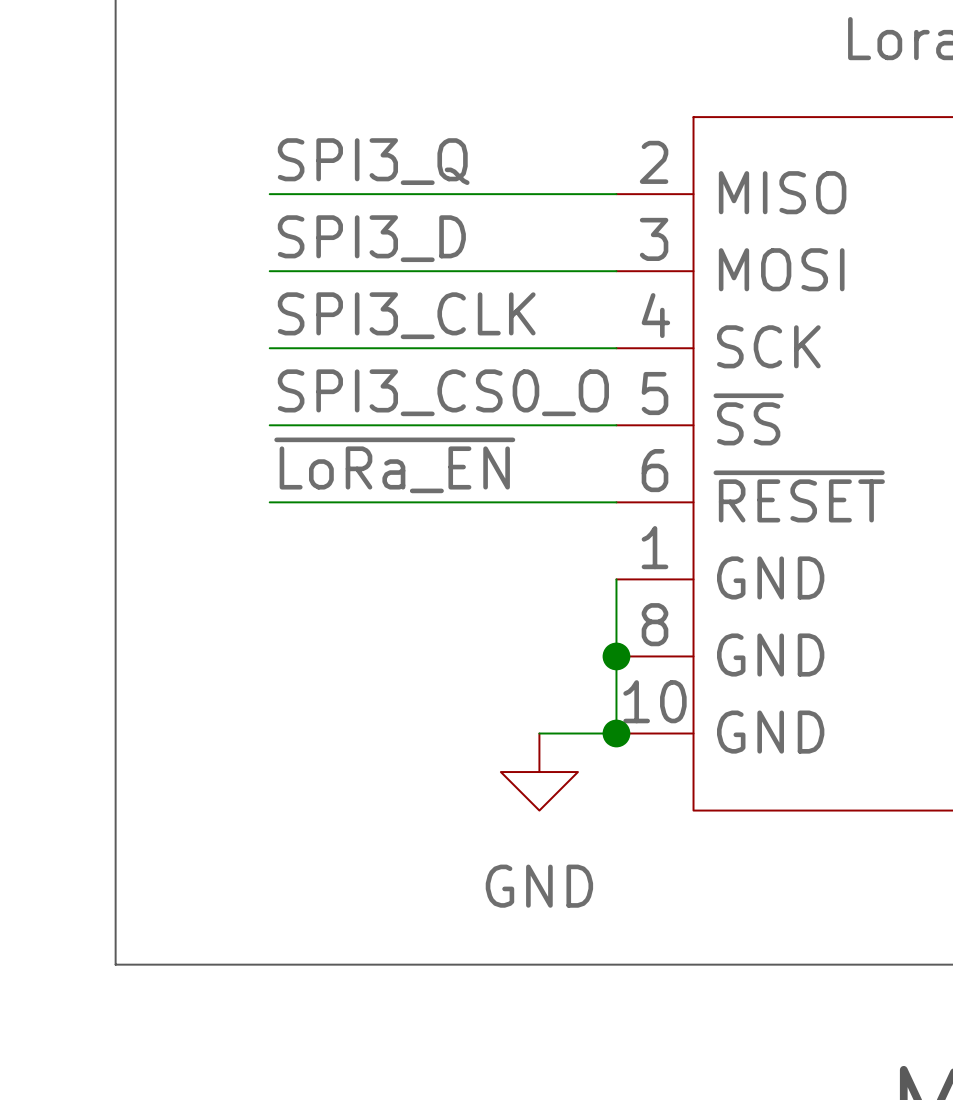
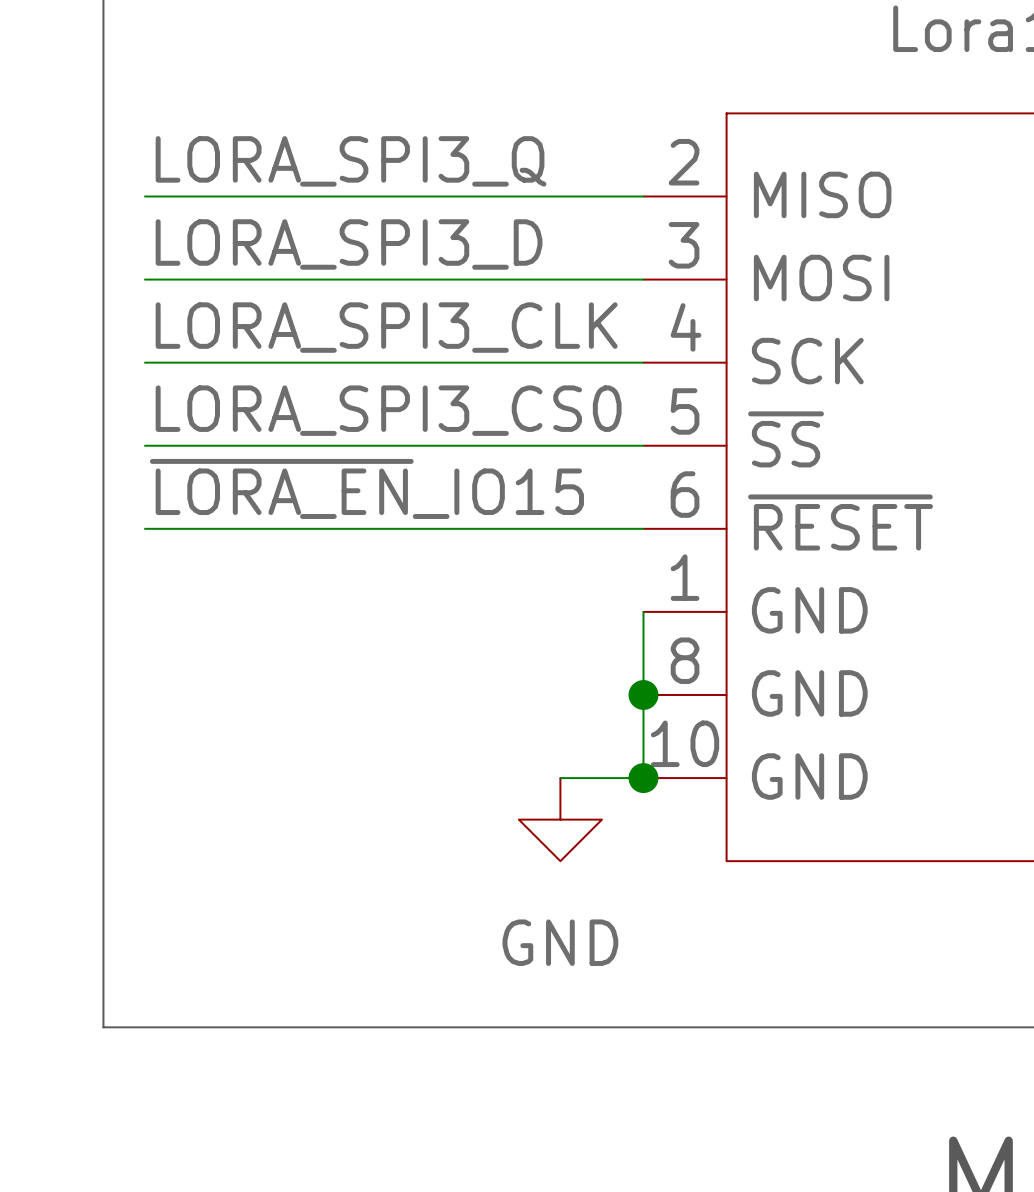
label: SPI3_Q (373, 161) -> LORA_SPI3_Q (351, 161)
wire: none -> (144, 196) (269, 196)
label: SPI3_D (371, 238) -> LORA_SPI3_D (349, 244)
wire: none -> (144, 279) (269, 279)
label: SPI3_CLK (406, 315) -> LORA_SPI3_CLK (386, 327)
wire: none -> (144, 362) (269, 362)
label: SPI3_CS0_O (443, 392) -> LORA_SPI3_CS0 (388, 410)
wire: none -> (144, 445) (269, 445)
label: ~{LoRa_EN} (394, 465) -> ~{LORA_EN}_IO15 (366, 488)
wire: none -> (144, 528) (269, 528)

